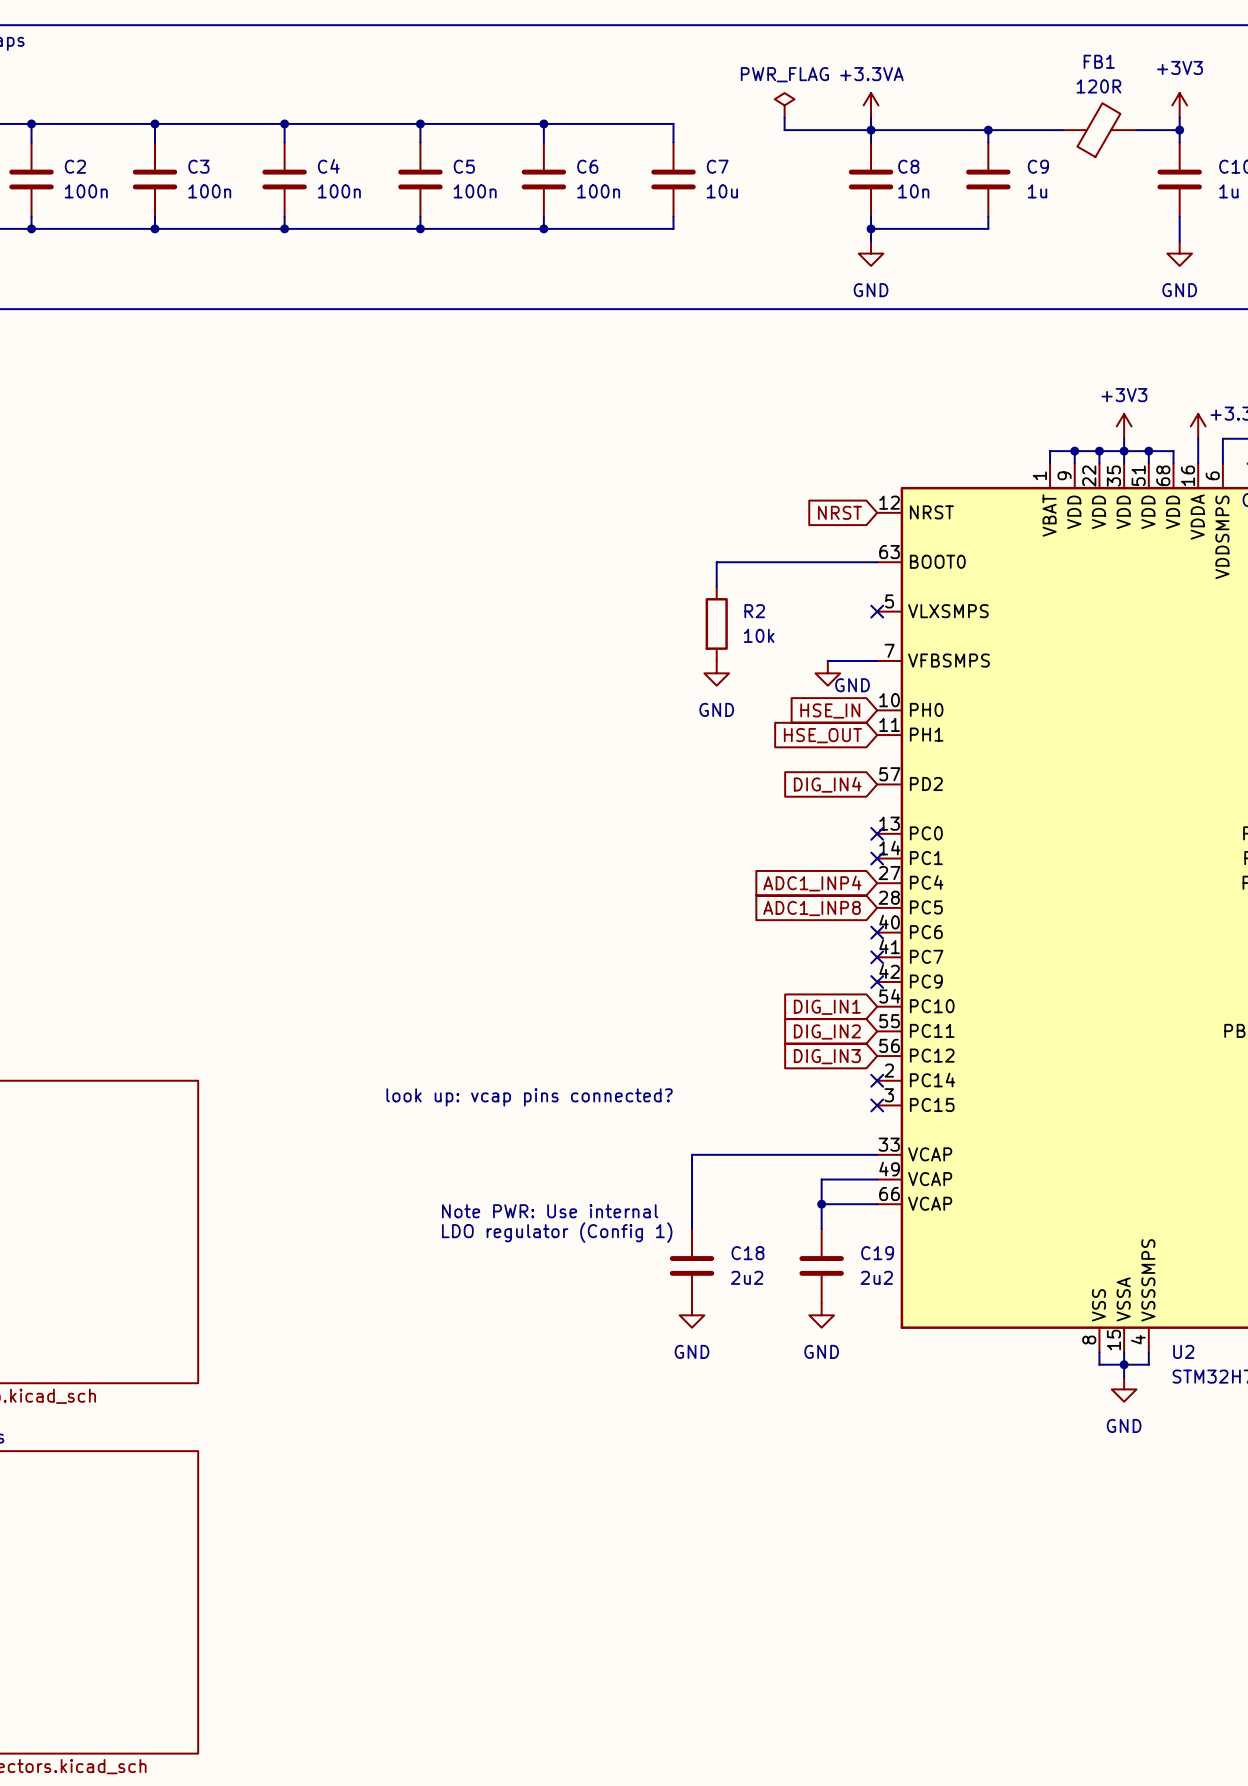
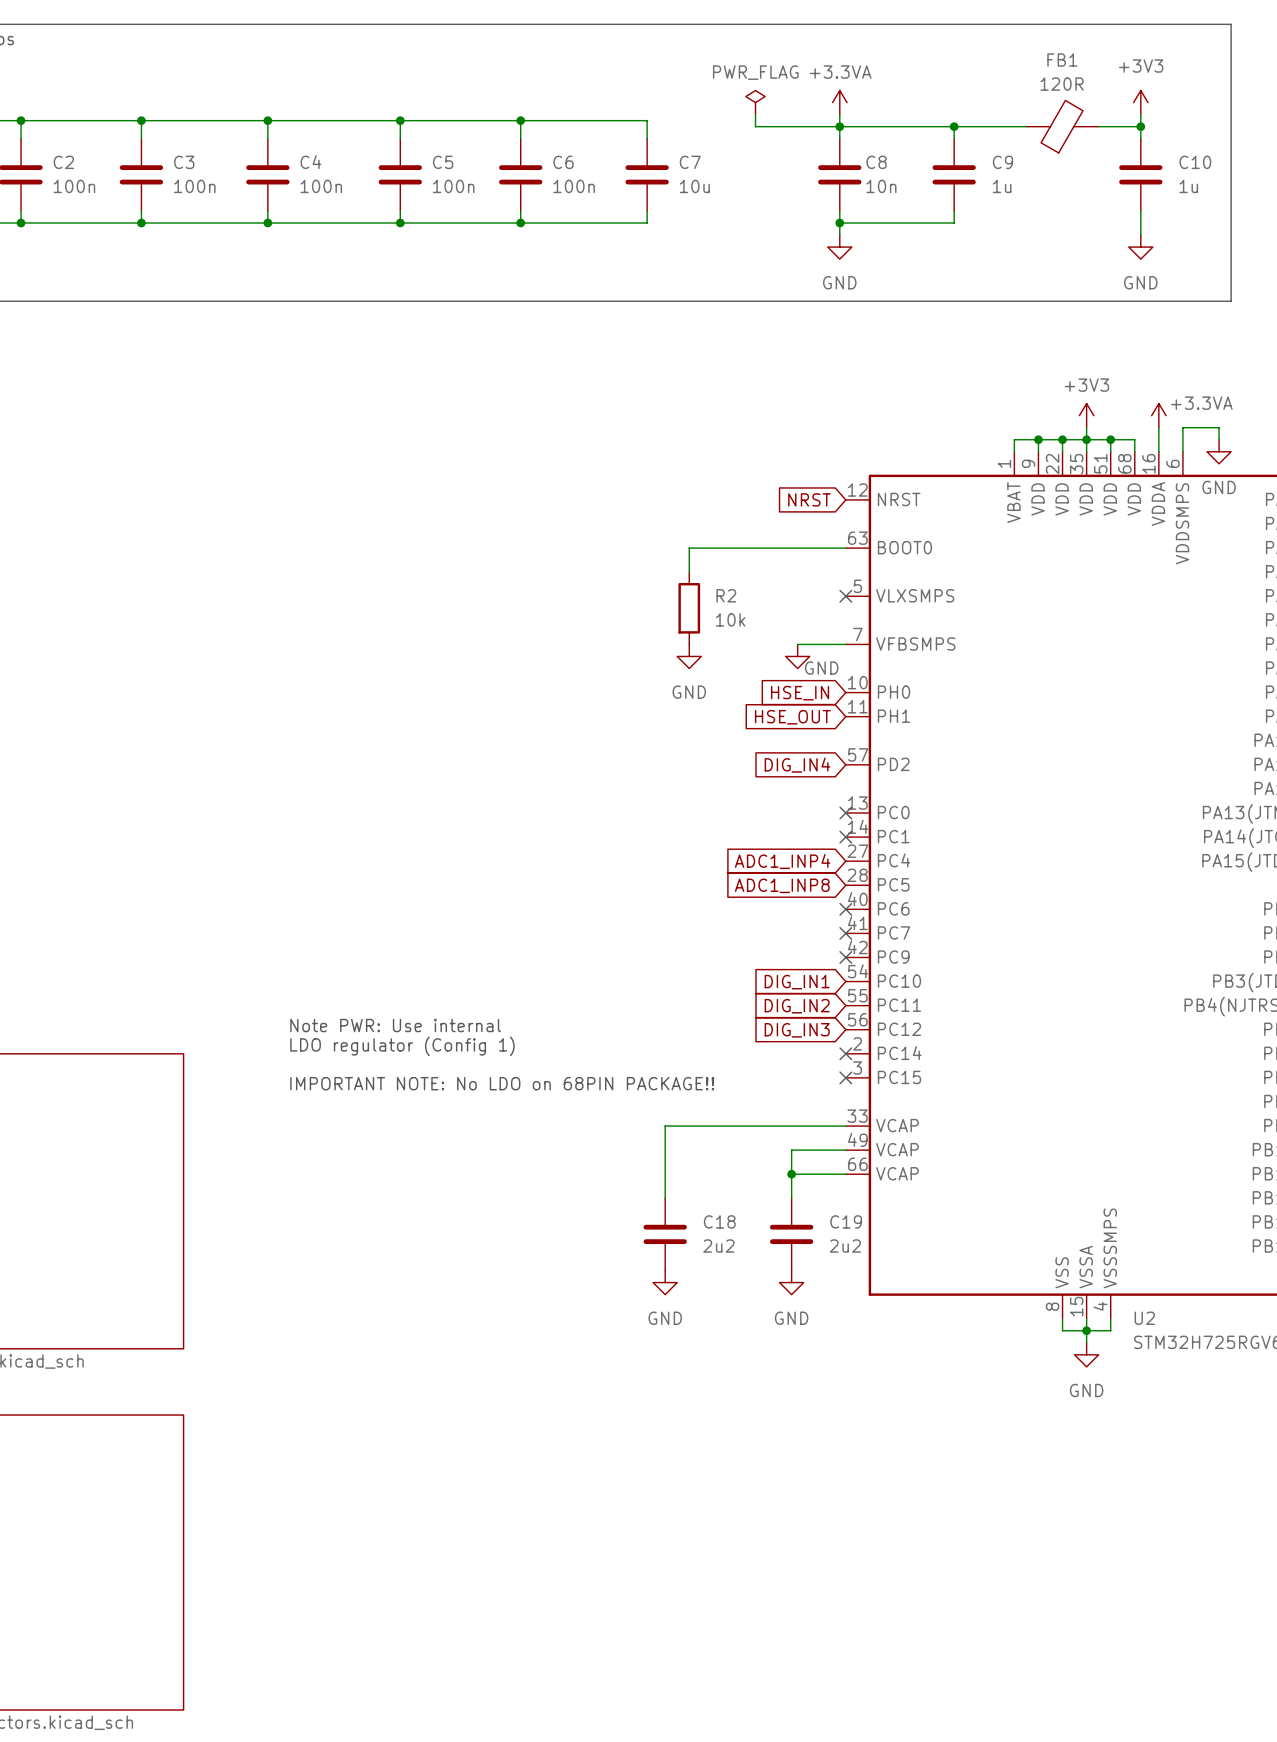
text: look up: vcap pins connected? (529, 1097) -> none
text: none -> IMPORTANT NOTE: No LDO on 68PIN PACKAGE!! (502, 1083)
text position: Note PWR: Use internal (550, 1211) -> Note PWR: Use internal (395, 1025)
text position: LDO regulator (Config 1) (557, 1232) -> LDO regulator (Config 1) (402, 1046)

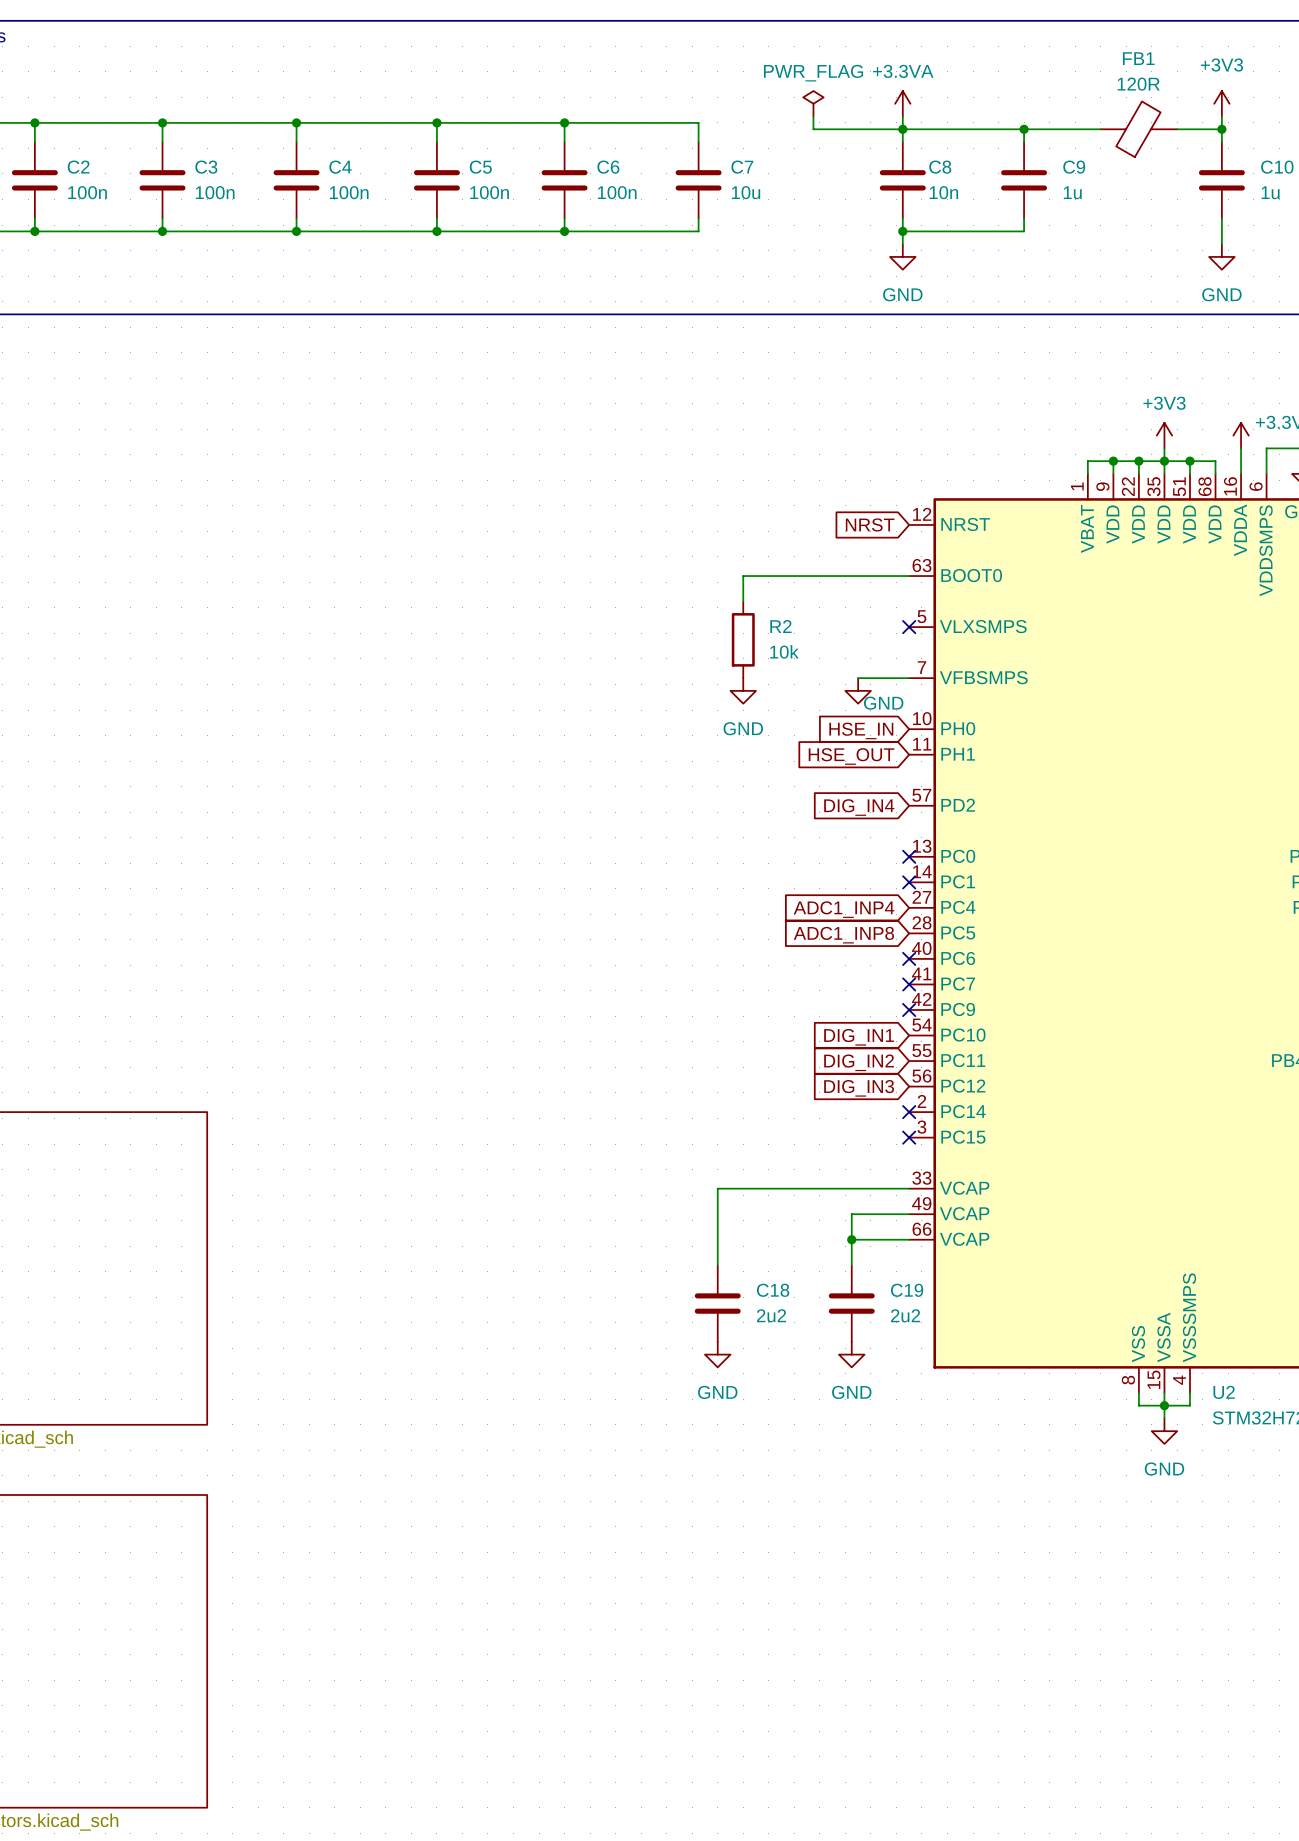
text: Note PWR: Use internal (395, 1025) -> none
text: LDO regulator (Config 1) (402, 1046) -> none
text: IMPORTANT NOTE: No LDO on 68PIN PACKAGE!! (502, 1083) -> none

